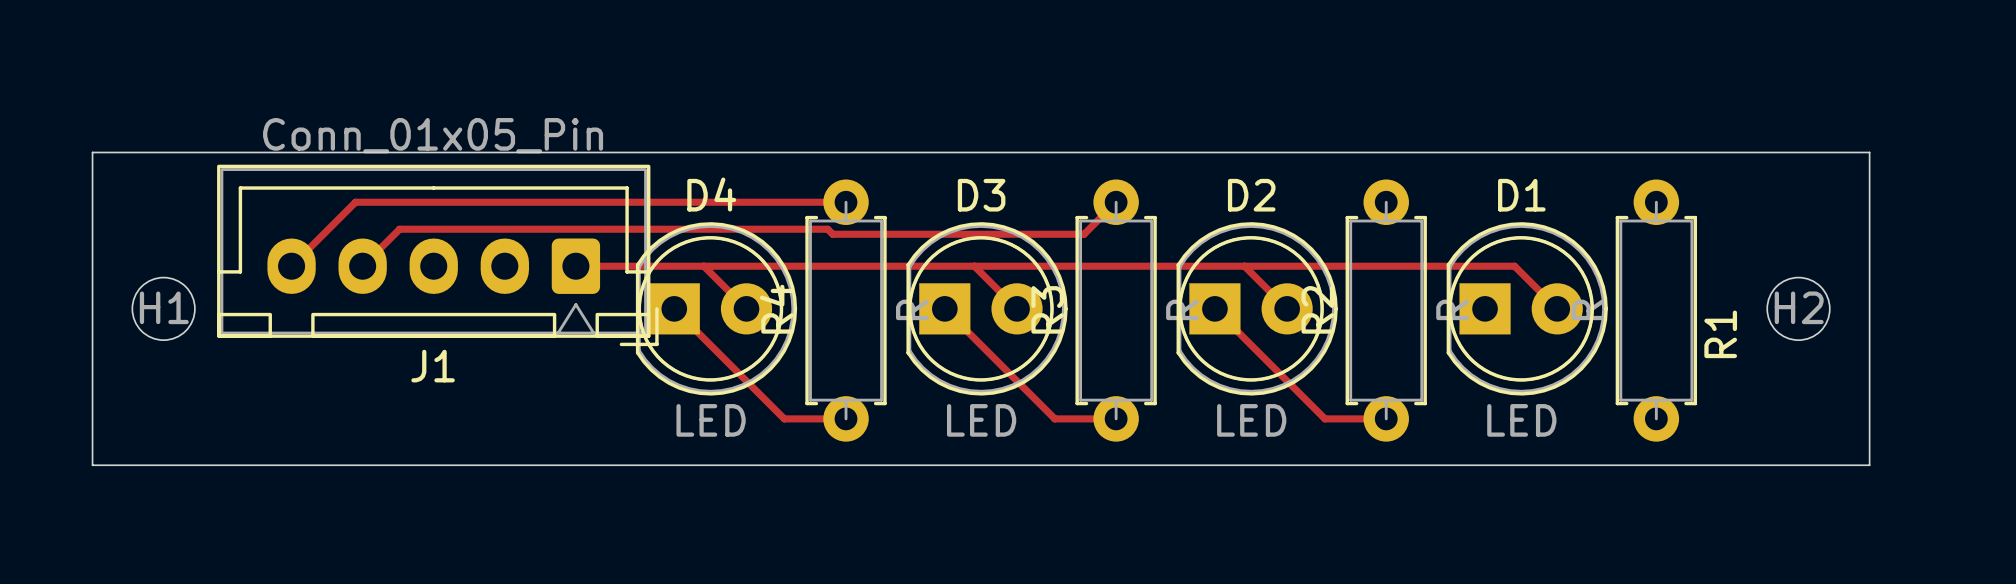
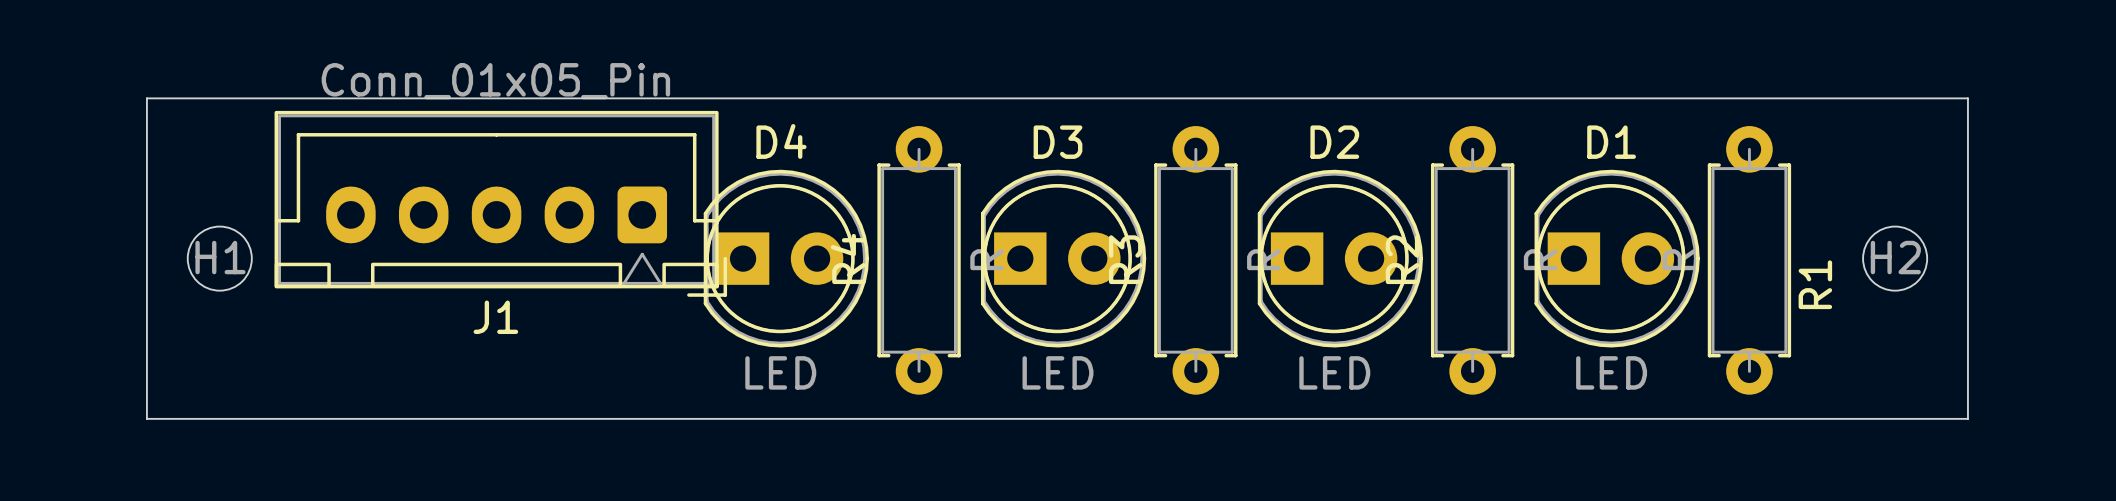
track: (846, 202) (355, 202) (291, 266) -> none
track: (1116, 202) (1084, 234) (832, 234) (827, 229) (399, 229) (362, 266) -> none
track: (575, 266) (1514, 266) (1557, 308) -> none
track: (703, 266) (746, 308) -> none
track: (974, 266) (1017, 308) -> none
track: (1244, 266) (1287, 308) -> none
track: (674, 308) (784, 418) (846, 418) -> none
track: (944, 308) (1054, 418) (1116, 418) -> none
track: (1214, 308) (1324, 418) (1386, 418) -> none

